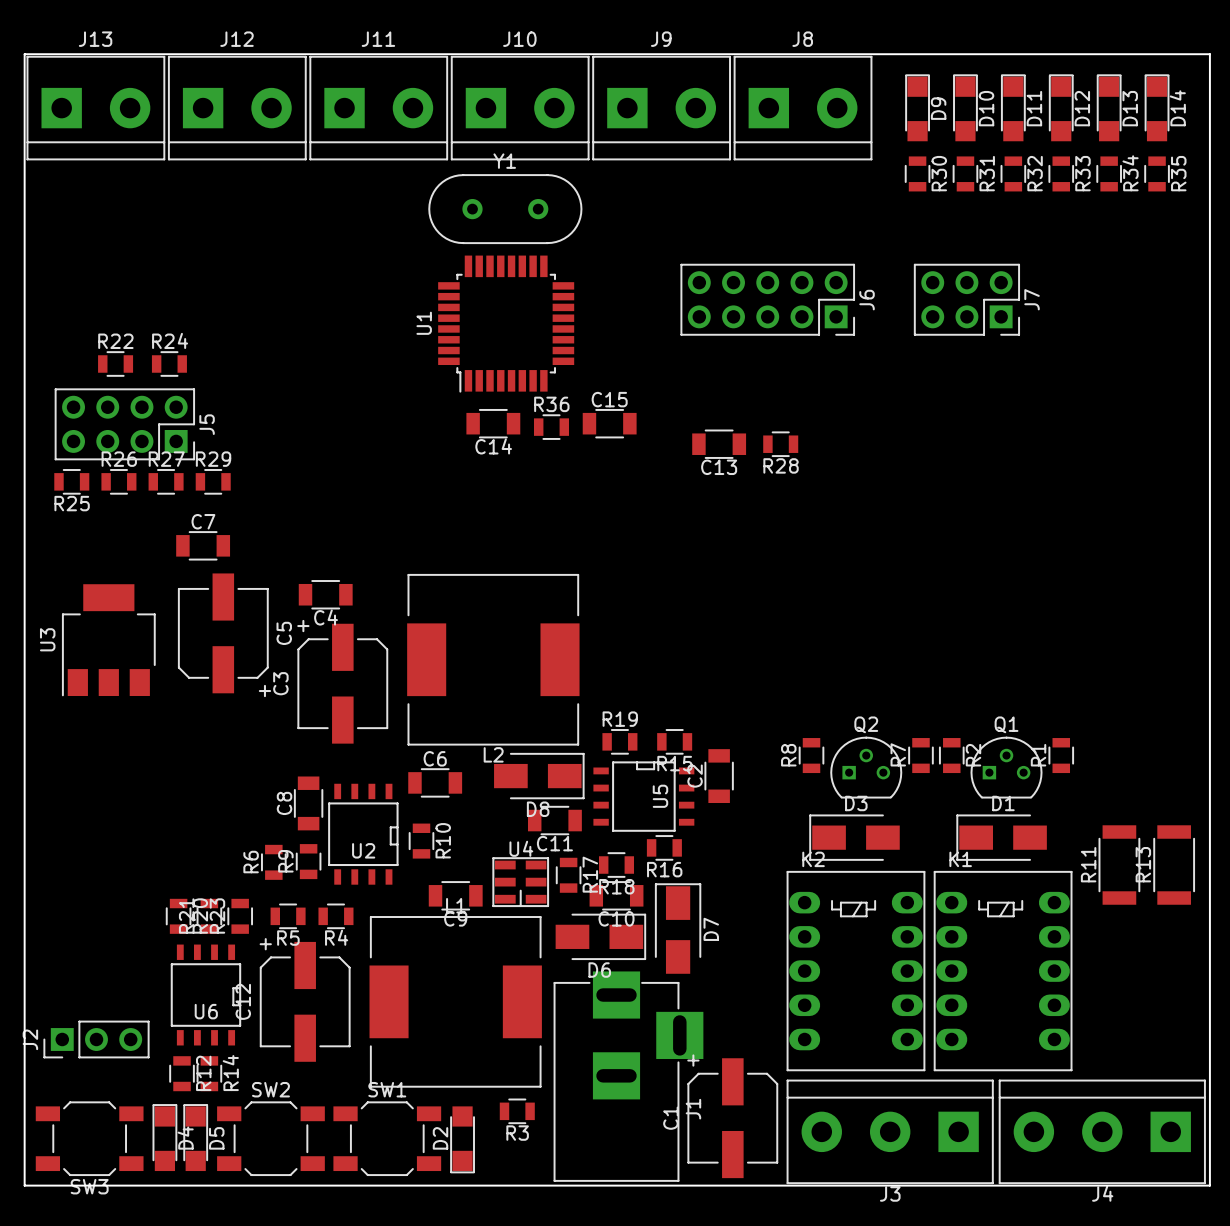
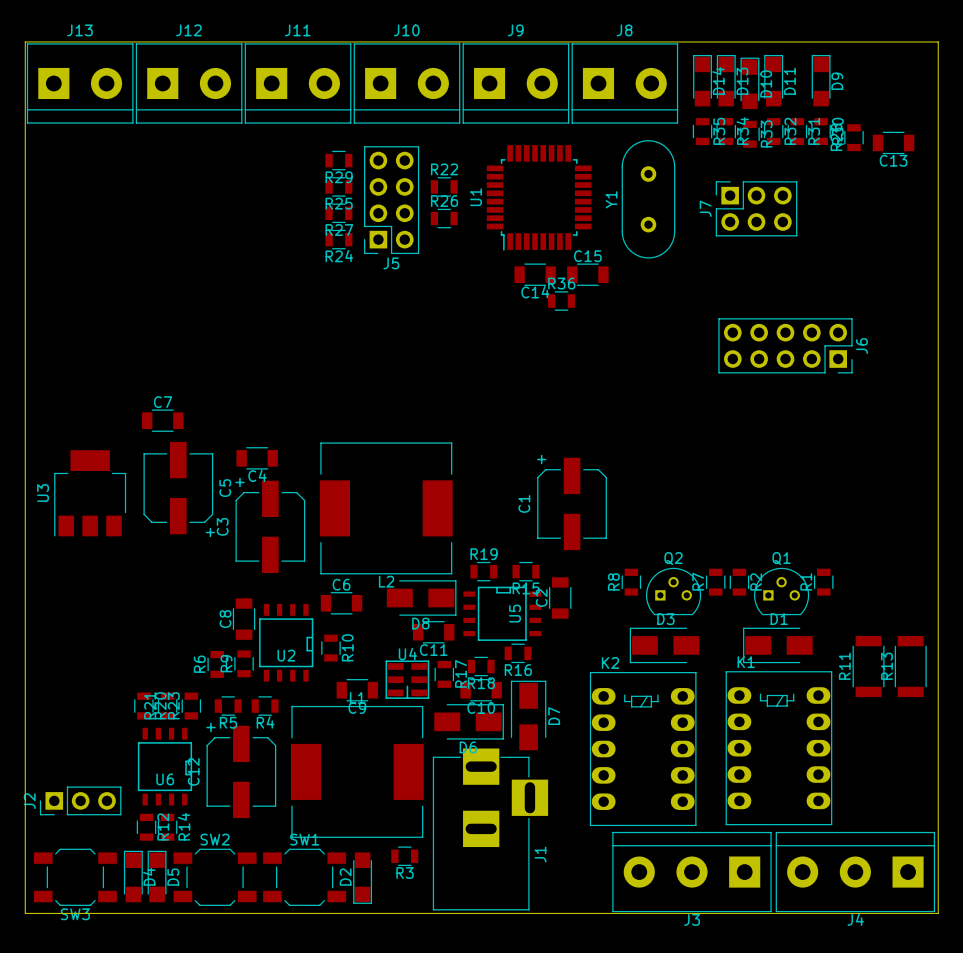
D9 position: (917, 107) -> (821, 80)
D11 position: (1013, 107) -> (773, 80)
D12: (1061, 107) -> none
D13 position: (1109, 107) -> (726, 80)
D14 position: (1157, 107) -> (702, 80)
Y1 name position: Y1 (504, 161) -> Y1 (611, 199)
R31: none -> (797, 131)
R30 position: (917, 173) -> (821, 131)
R31 name: R31 (987, 173) -> R33 (766, 133)
R32 position: (1013, 173) -> (773, 131)
R33: (1061, 173) -> none
R34 position: (1109, 173) -> (726, 131)
R35 position: (1157, 173) -> (702, 131)
Y1 rotation: 0° (505, 209) -> 90° clockwise (648, 199)
Y1 position: (505, 209) -> (648, 199)
J6 position: (767, 299) -> (785, 345)
J7 rotation: 0° (966, 299) -> 180° (756, 208)
U1 position: (506, 324) -> (539, 197)
R24 name position: R24 (170, 340) -> R24 (339, 256)
R22 position: (115, 363) -> (444, 186)
R24 position: (169, 363) -> (338, 239)
C14 position: (493, 423) -> (535, 274)
C15 position: (609, 423) -> (587, 274)
J5 rotation: 0° (124, 424) -> 90° clockwise (391, 200)
J5 position: (124, 424) -> (391, 200)
R36 position: (551, 427) -> (561, 301)
C13 position: (719, 444) -> (893, 142)
R28 rotation: 0° (780, 444) -> 90° clockwise (854, 137)
R28 position: (780, 444) -> (854, 137)
R27 name position: R27 (166, 459) -> R27 (339, 230)
R29 name position: R29 (213, 459) -> R29 (339, 177)
R25 position: (71, 481) -> (338, 186)
R26 position: (118, 481) -> (444, 218)
R27 position: (166, 481) -> (338, 213)
R29 position: (213, 481) -> (338, 160)
K2 position: (855, 971) -> (643, 749)
C1 position: (732, 1118) -> (572, 503)

